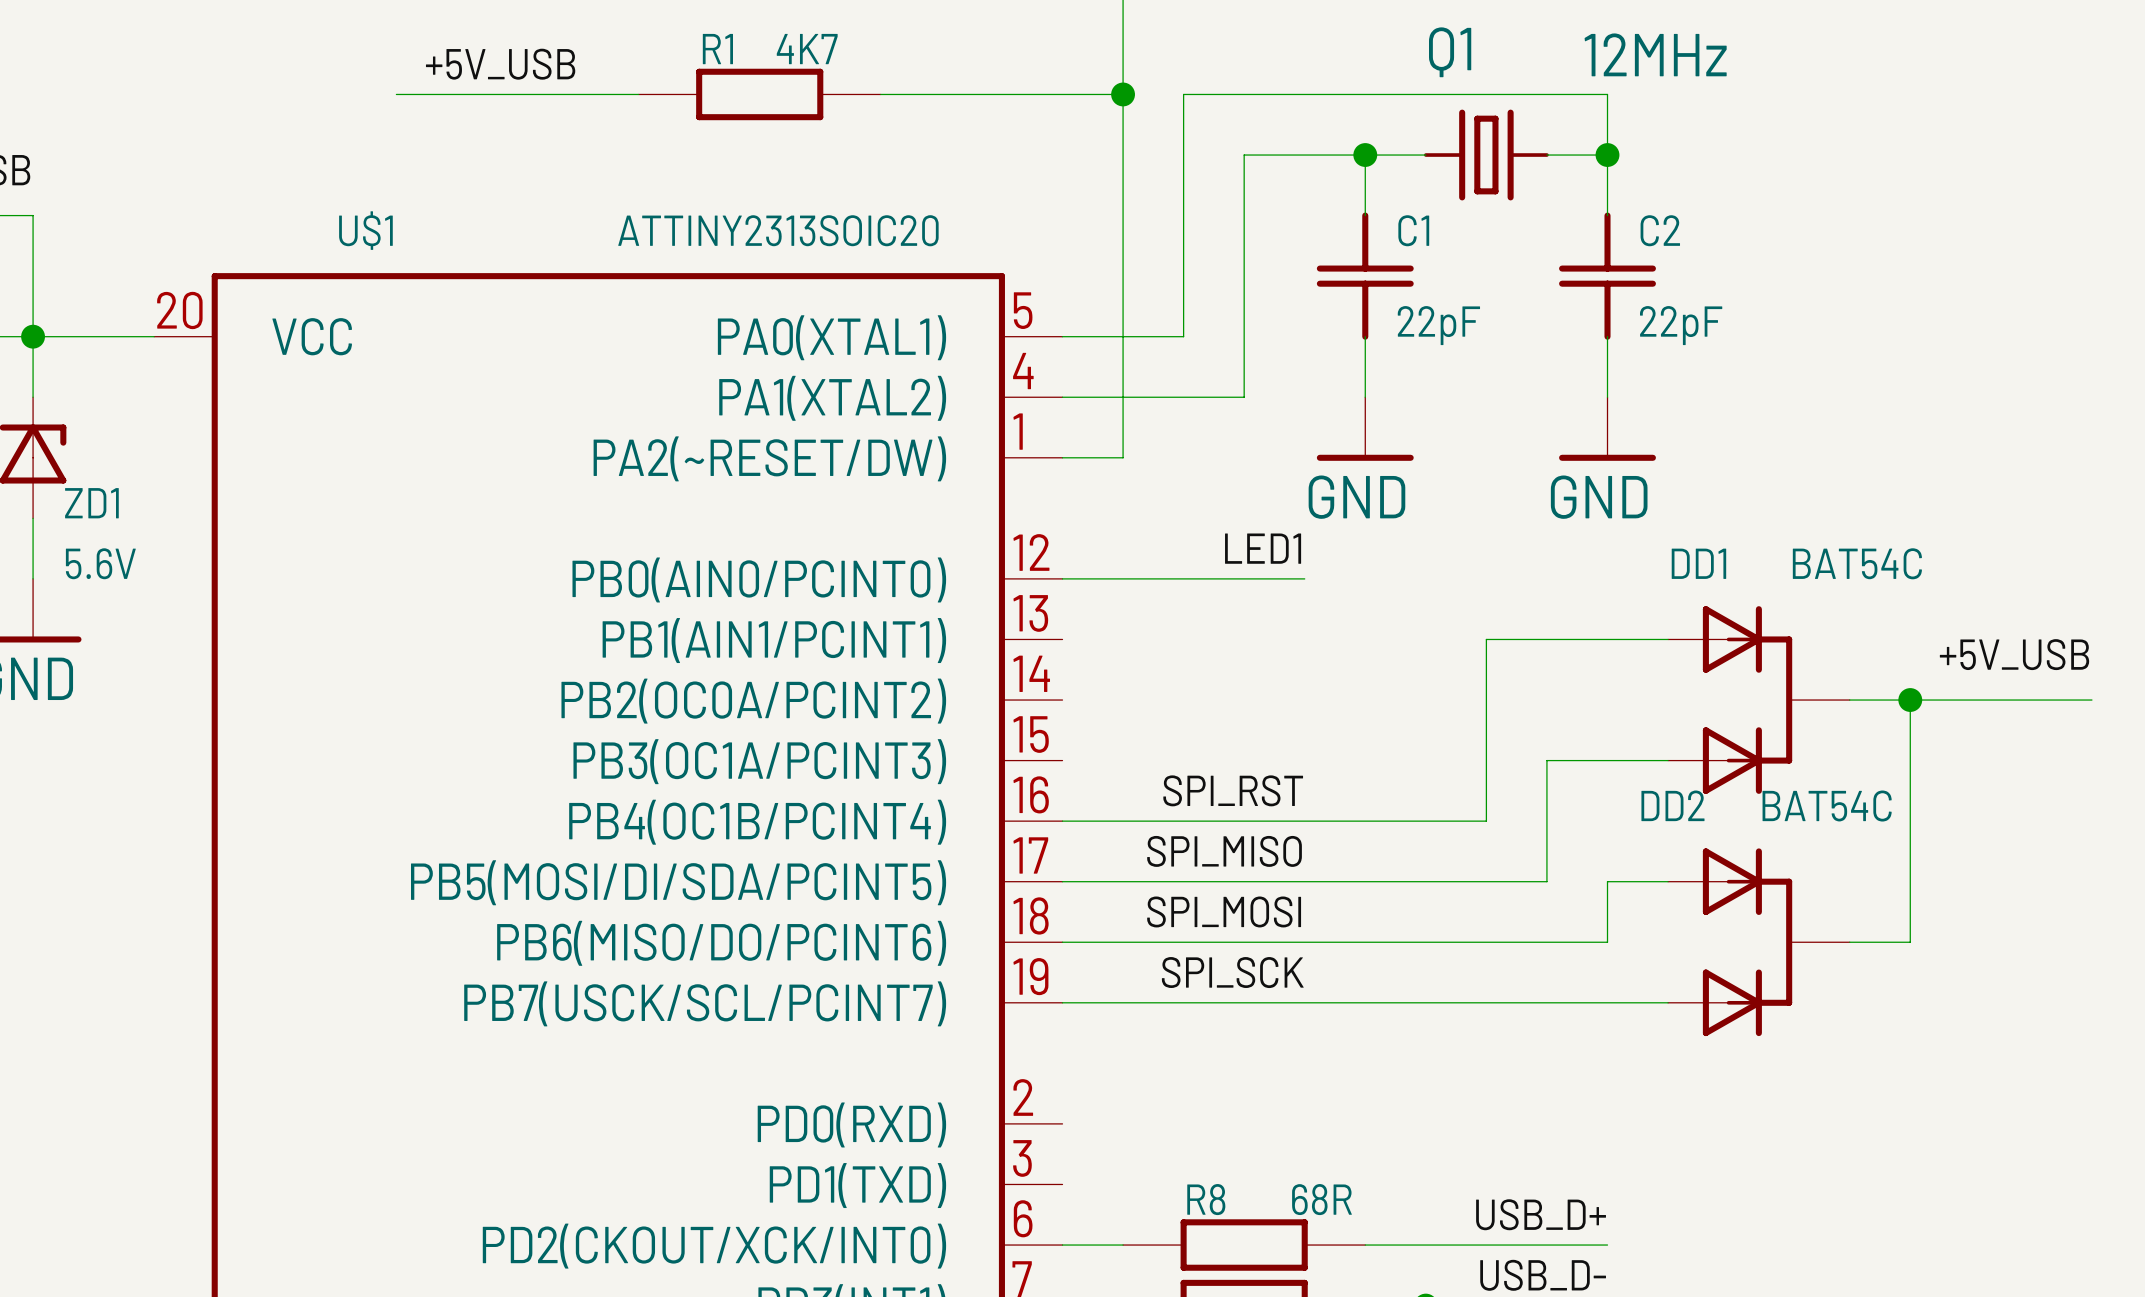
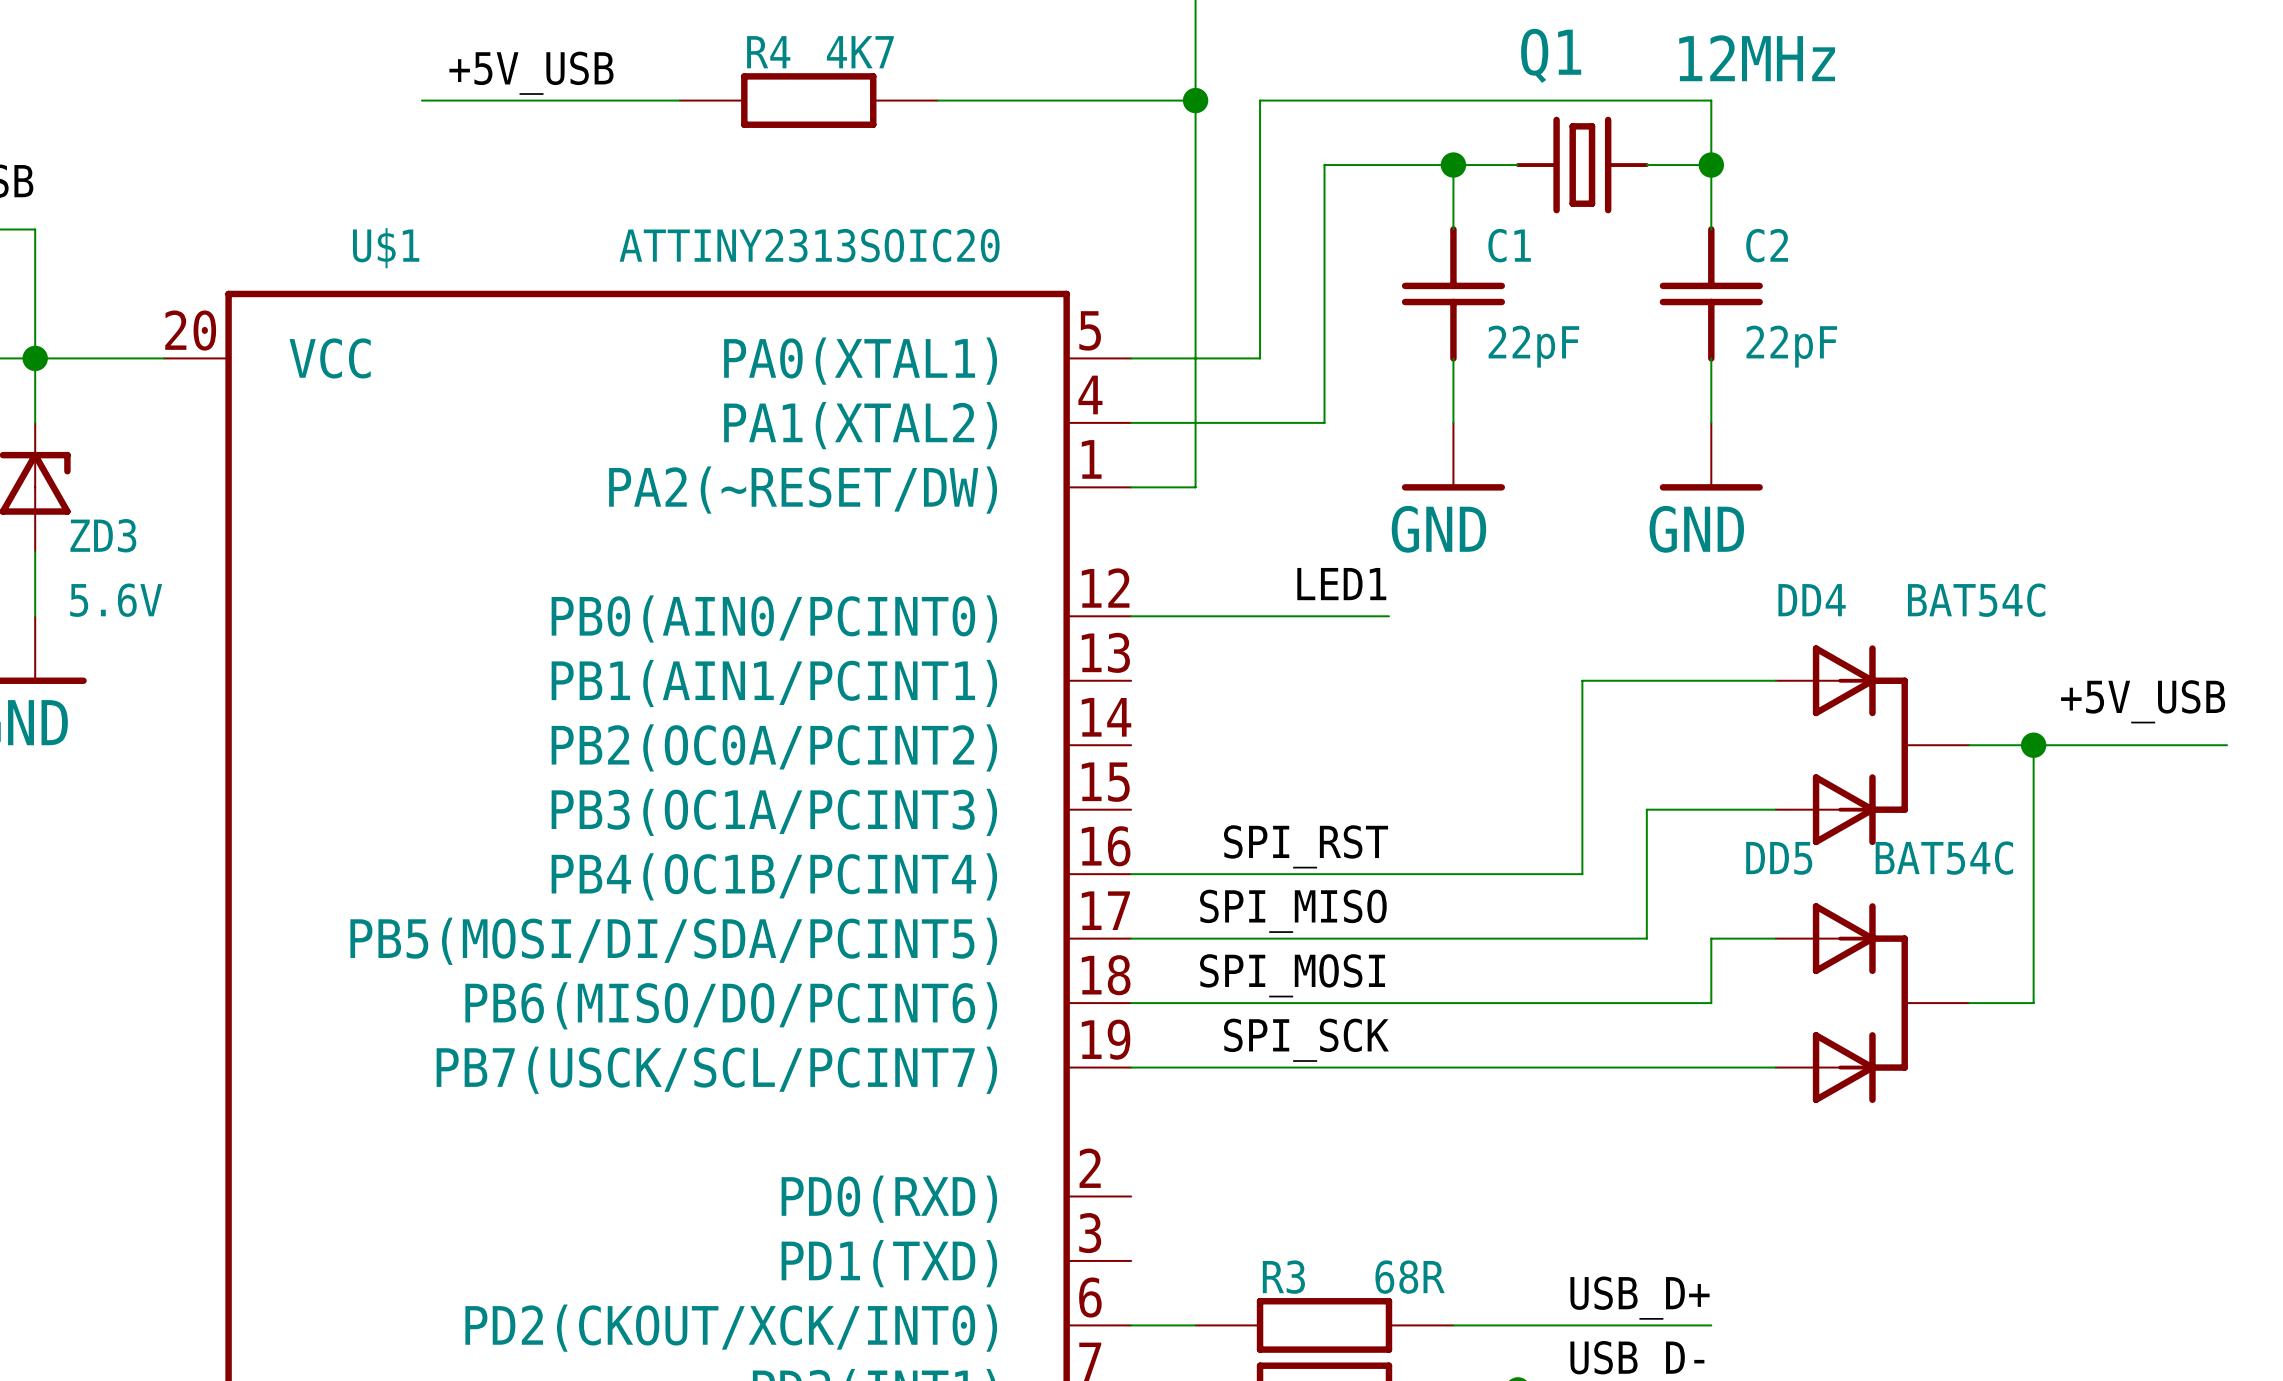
R1 name: R1 (717, 49) -> R4 (768, 52)
ZD1 name: ZD1 (91, 503) -> ZD3 (103, 535)
DD1 name: DD1 (1698, 563) -> DD4 (1812, 600)
DD2 name: DD2 (1672, 805) -> DD5 (1779, 858)
R8 name: R8 (1206, 1199) -> R3 (1283, 1277)

